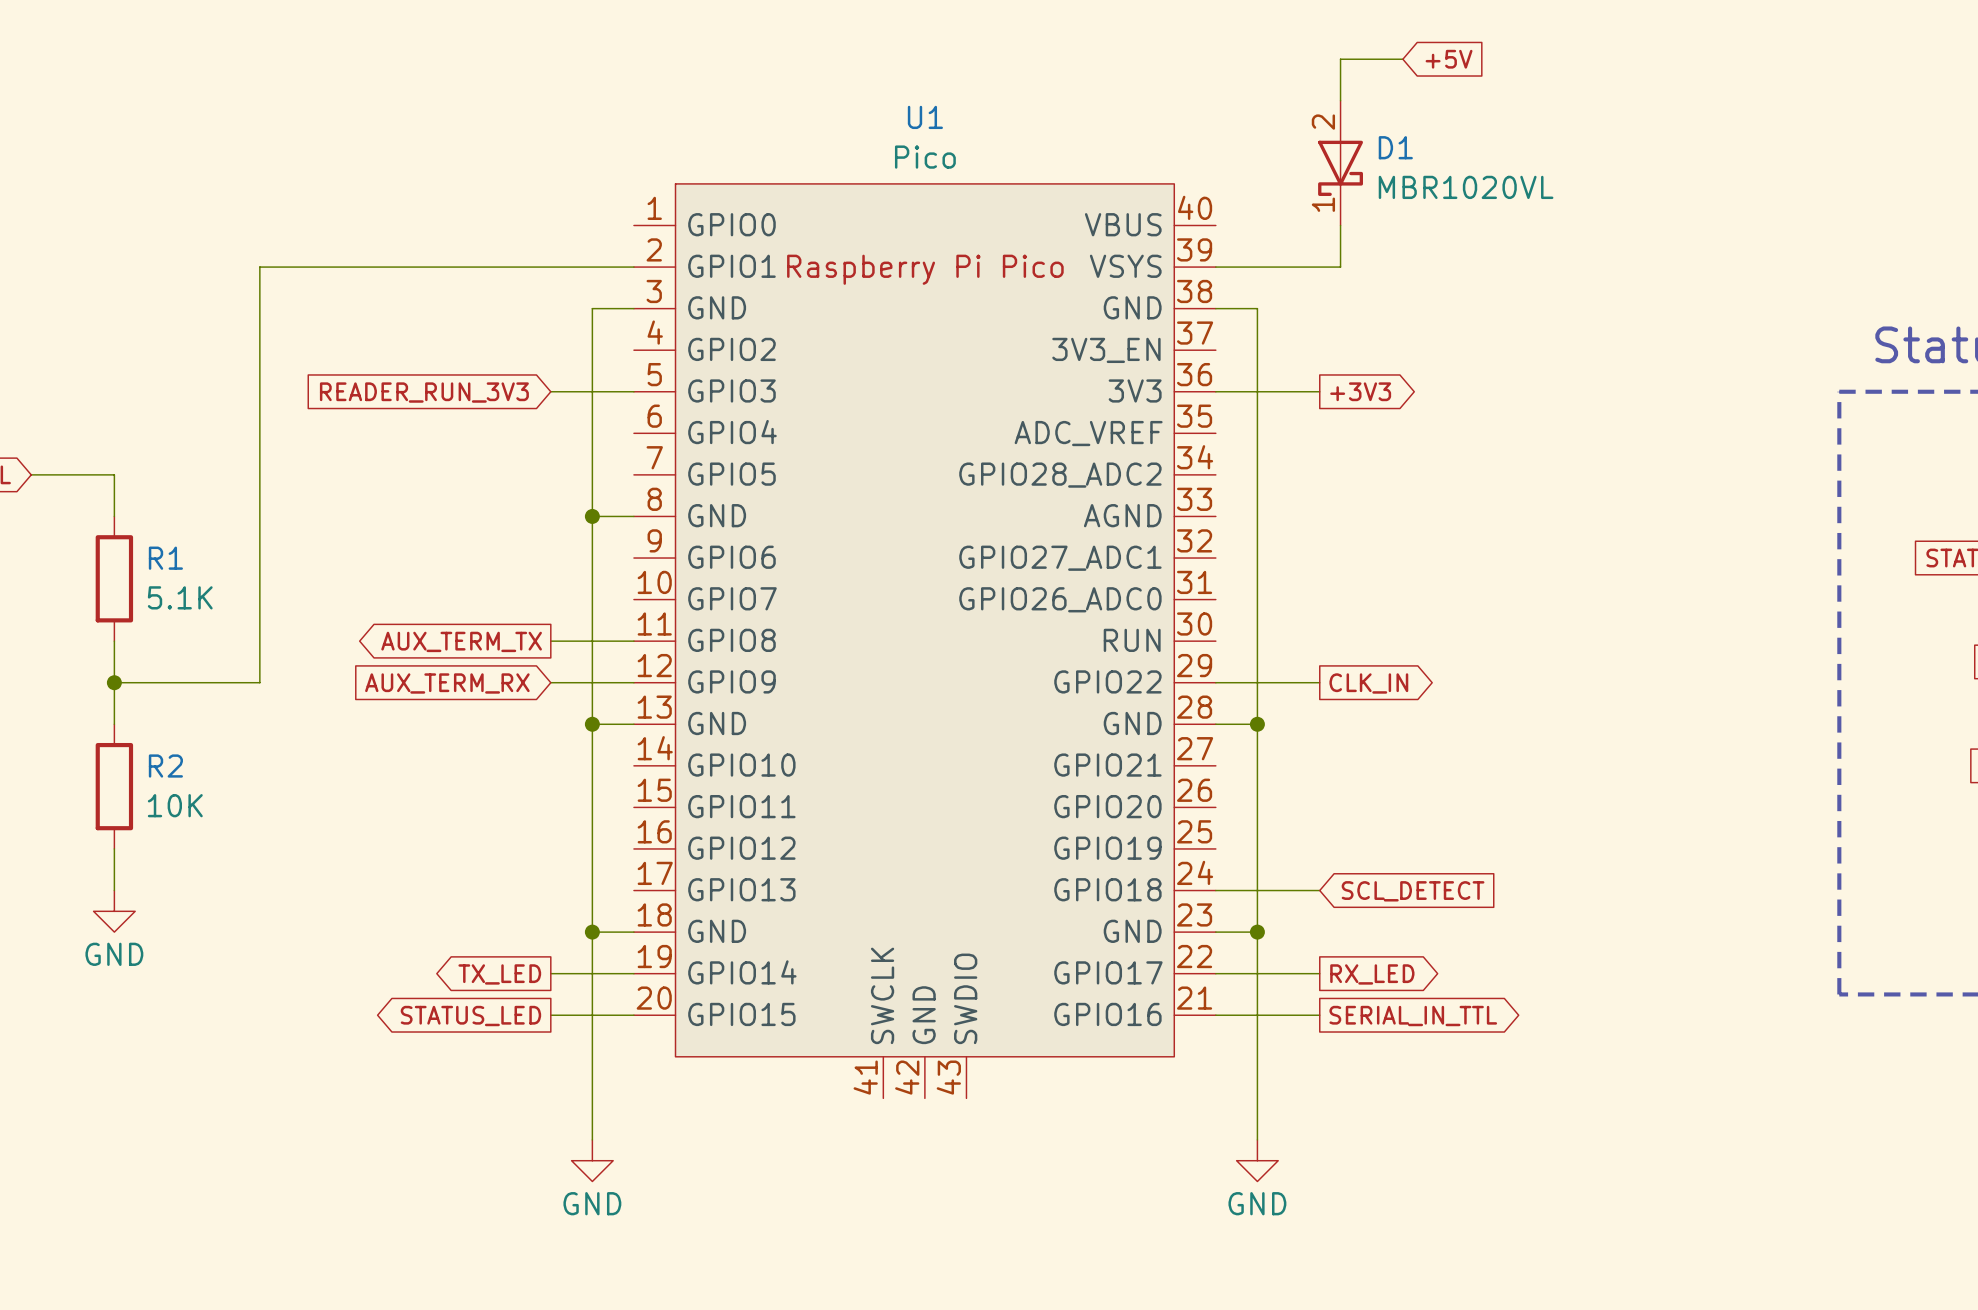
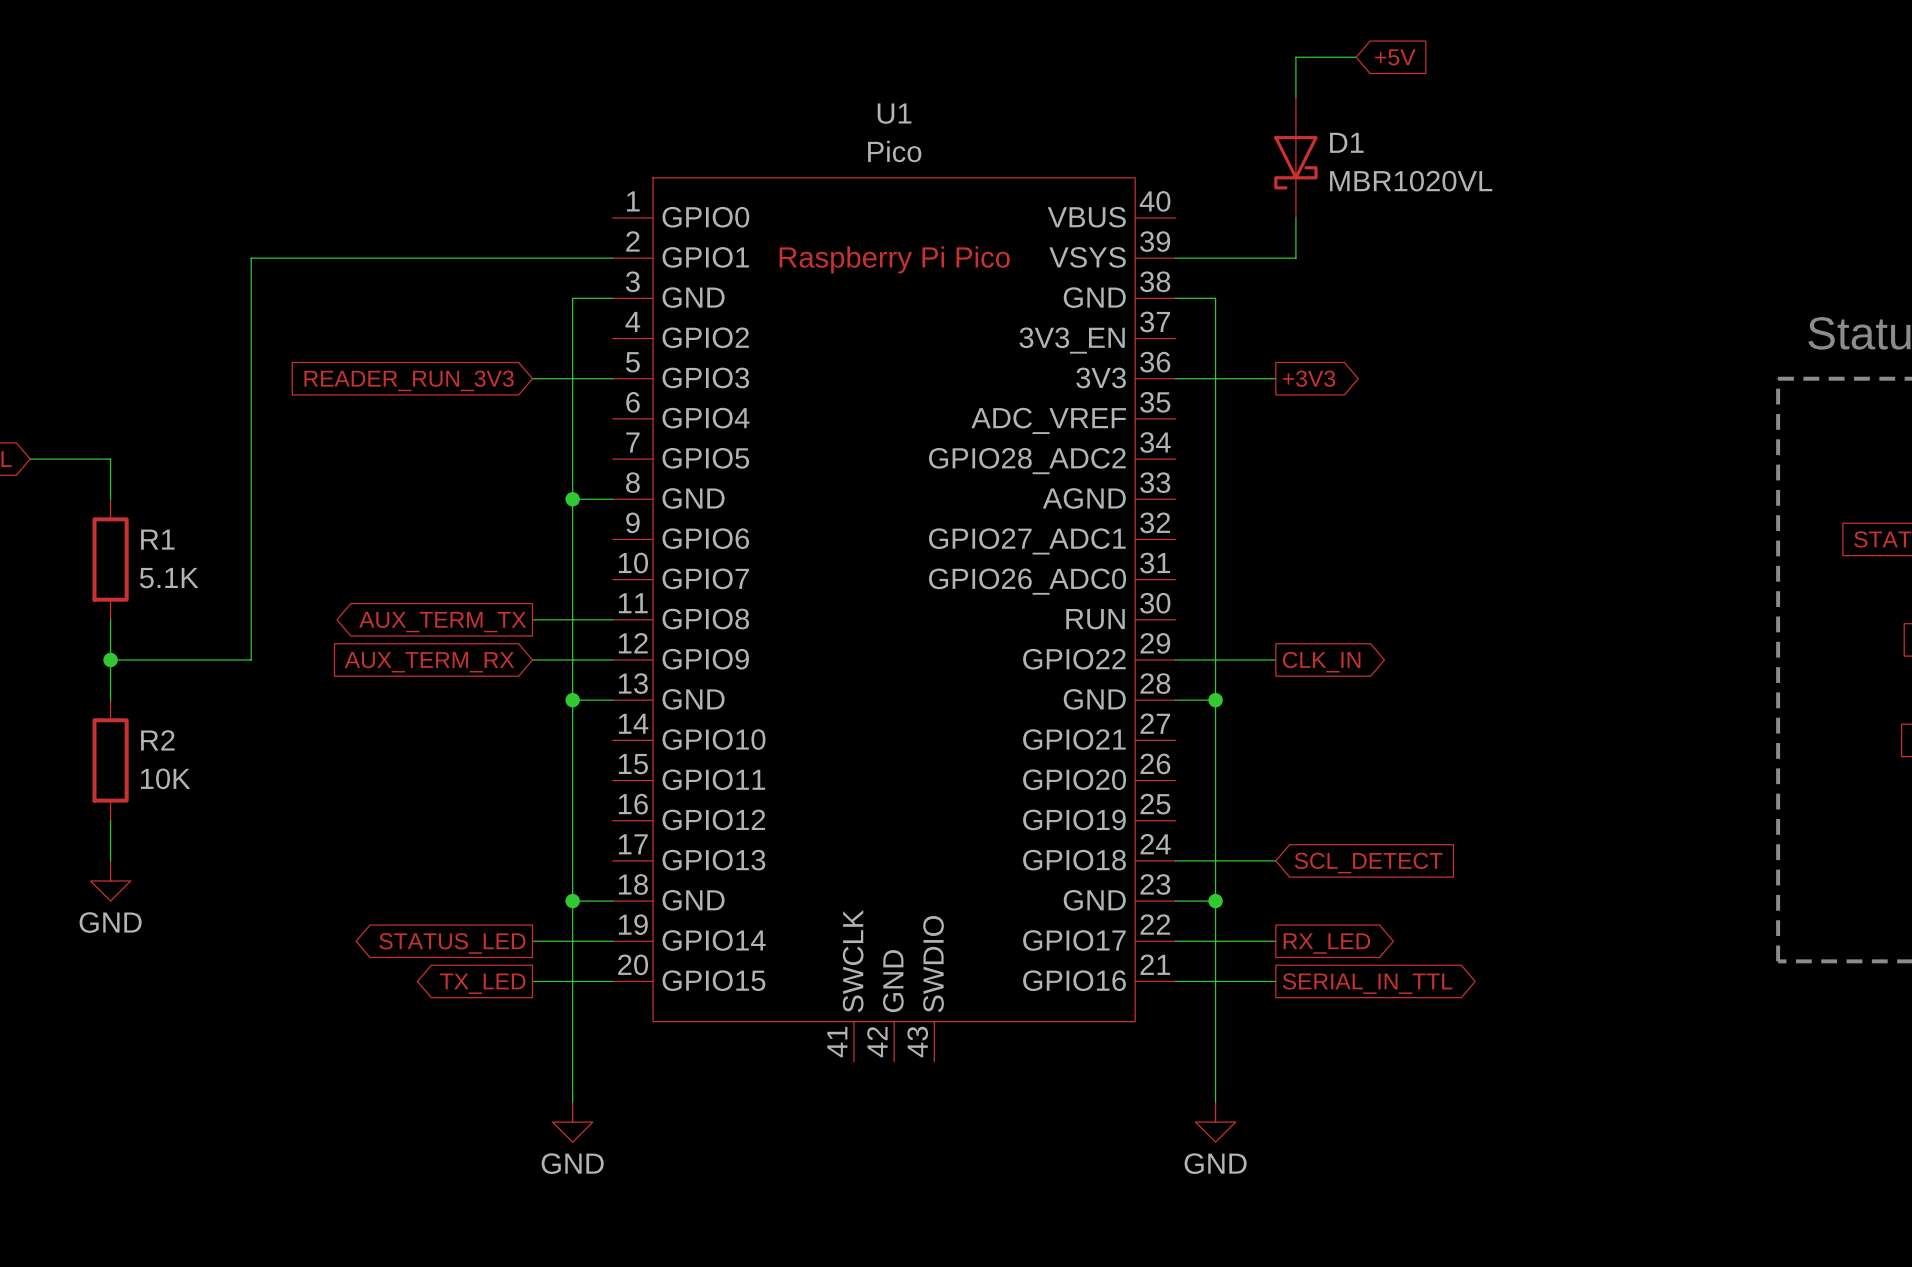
D1 pin number: 2 (1323, 122) -> none
D1 pin number: 1 (1323, 204) -> none
global label: TX_LED (499, 974) -> STATUS_LED (452, 943)
global label: STATUS_LED (470, 1016) -> TX_LED (482, 983)

